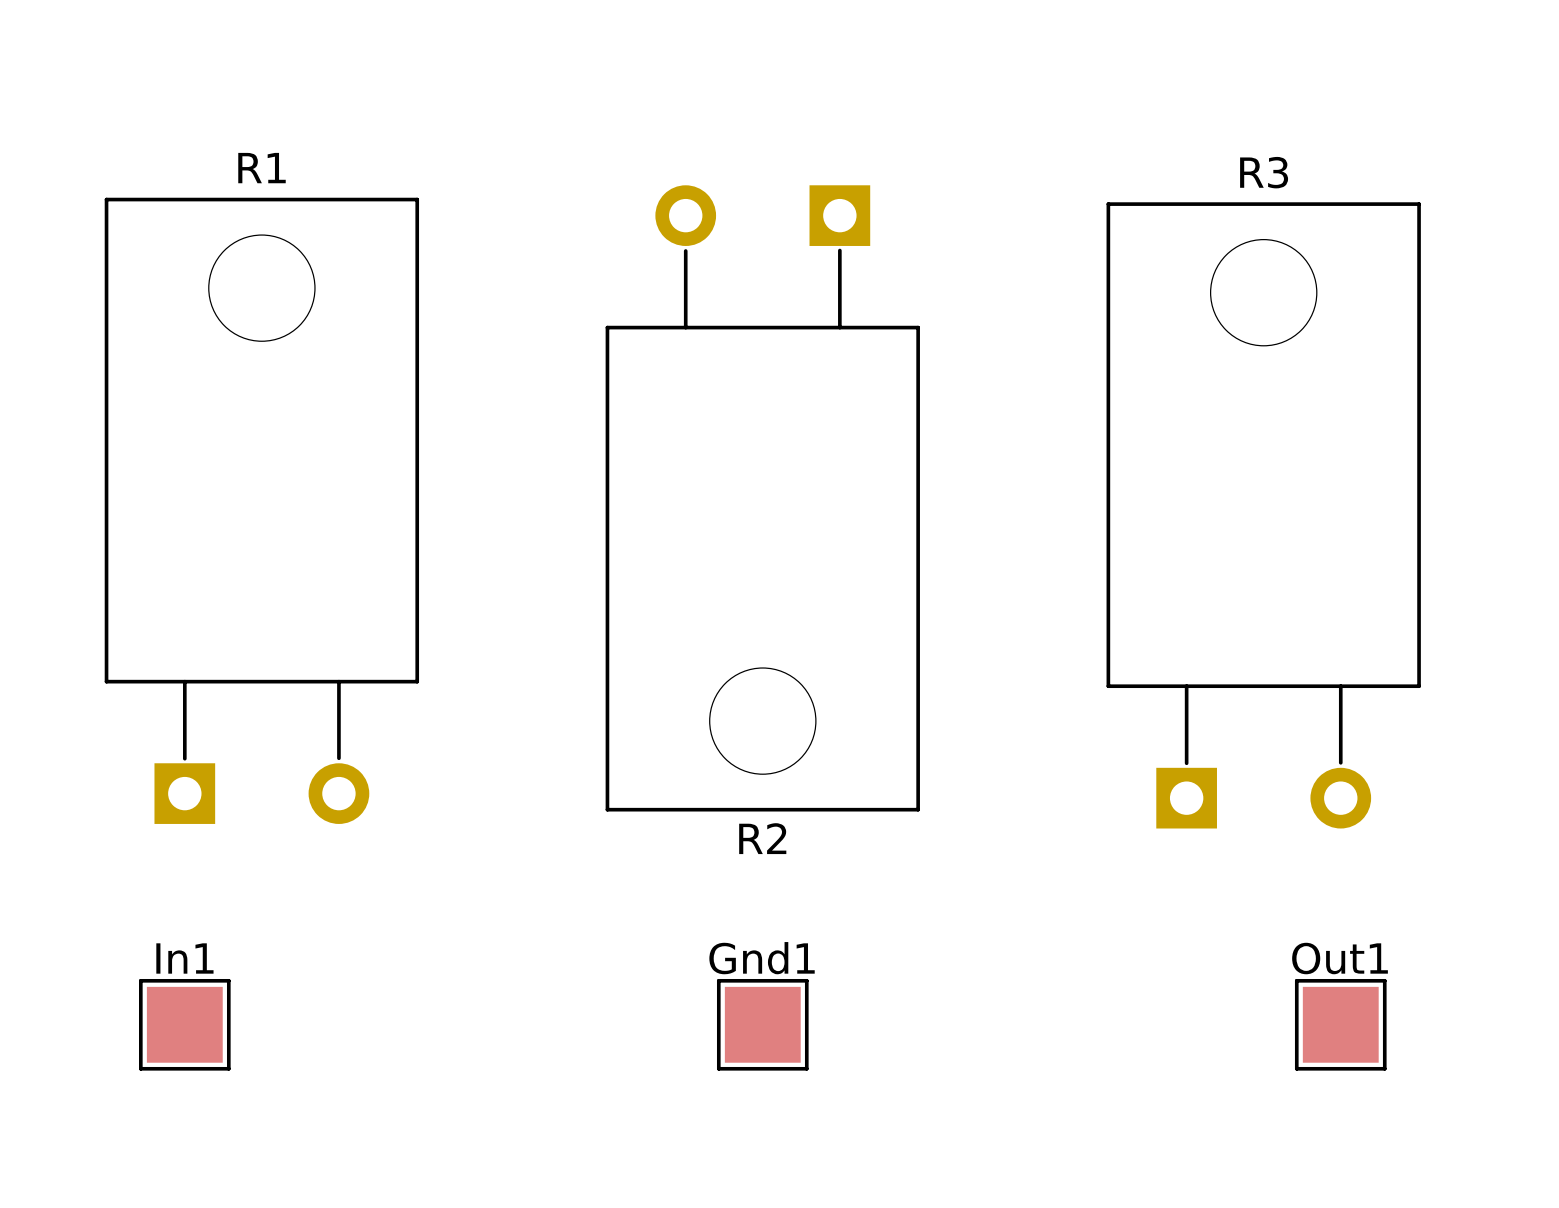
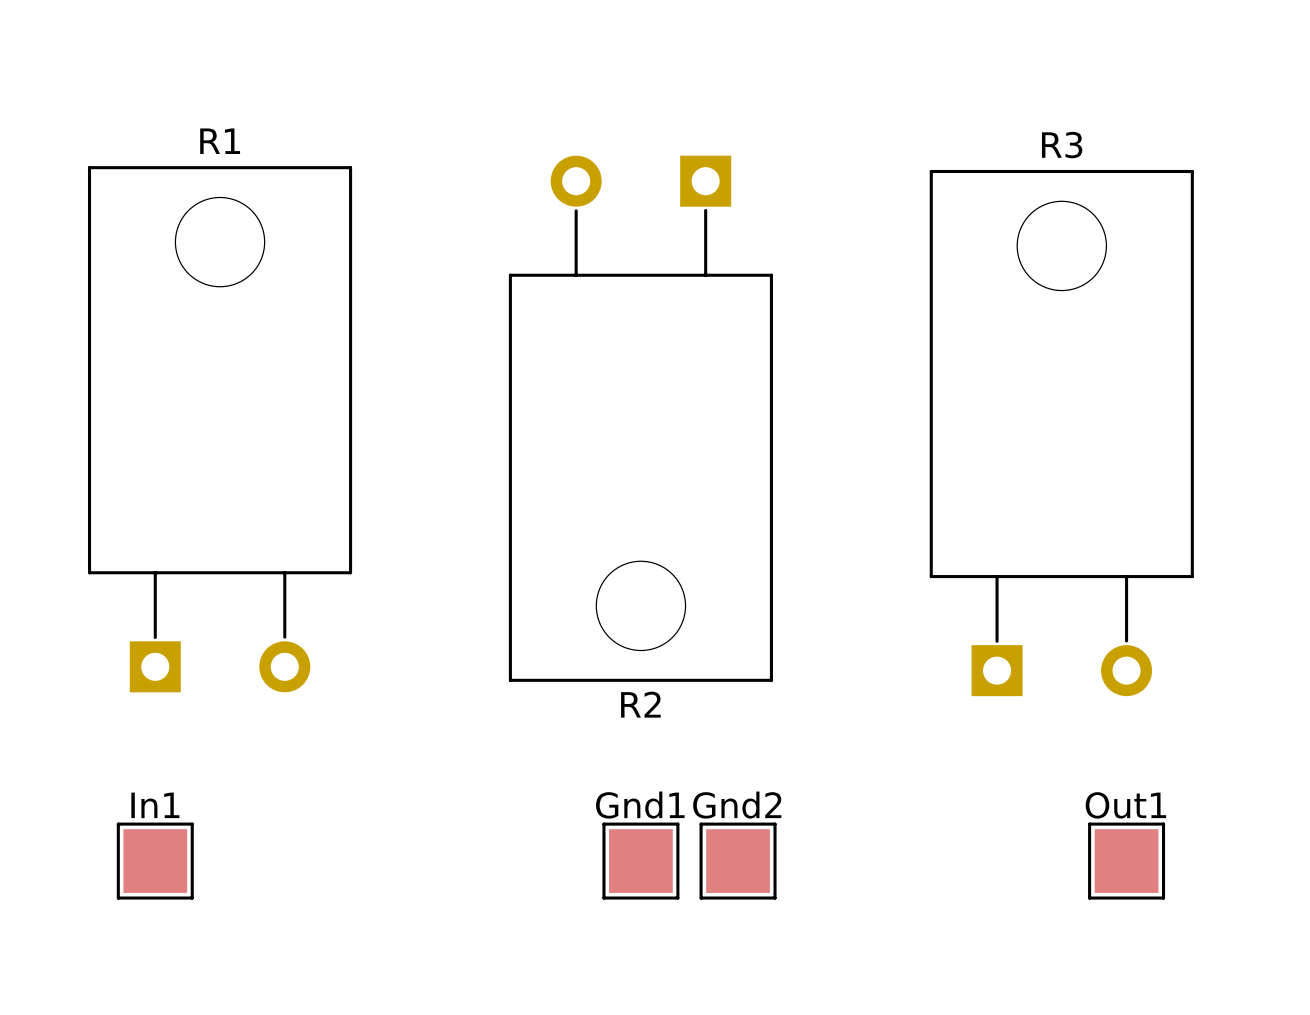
Gnd2: none -> (738, 861)

